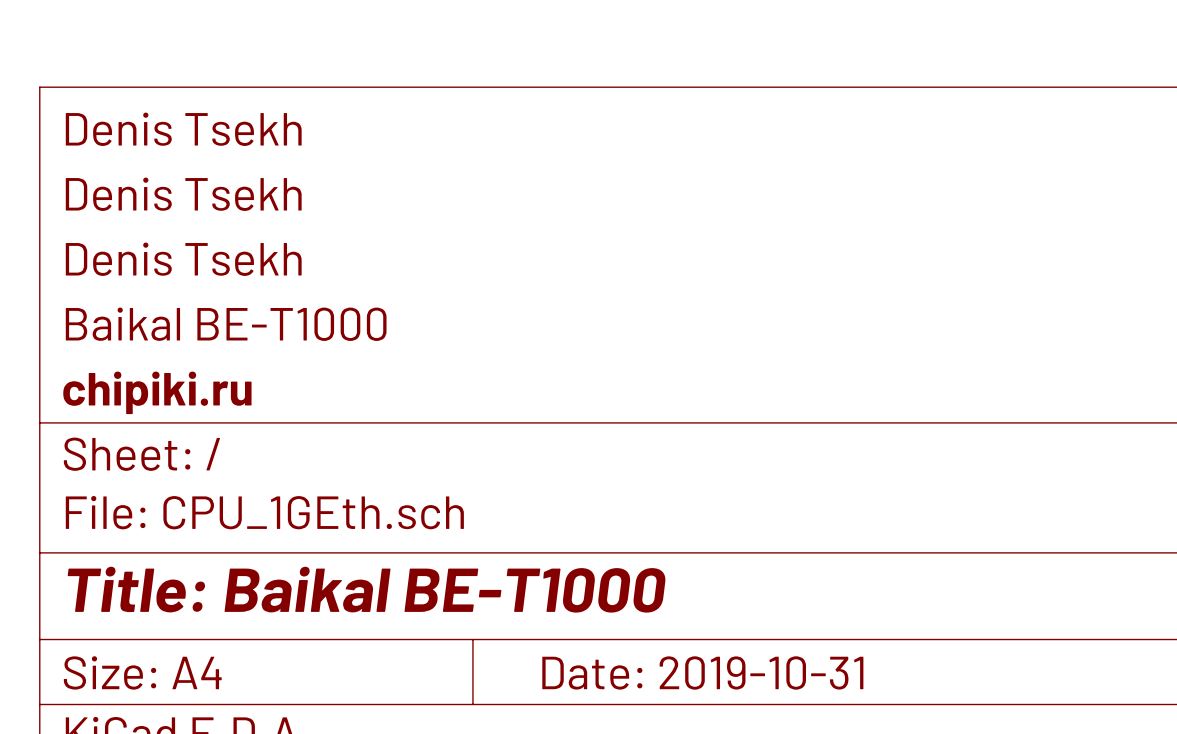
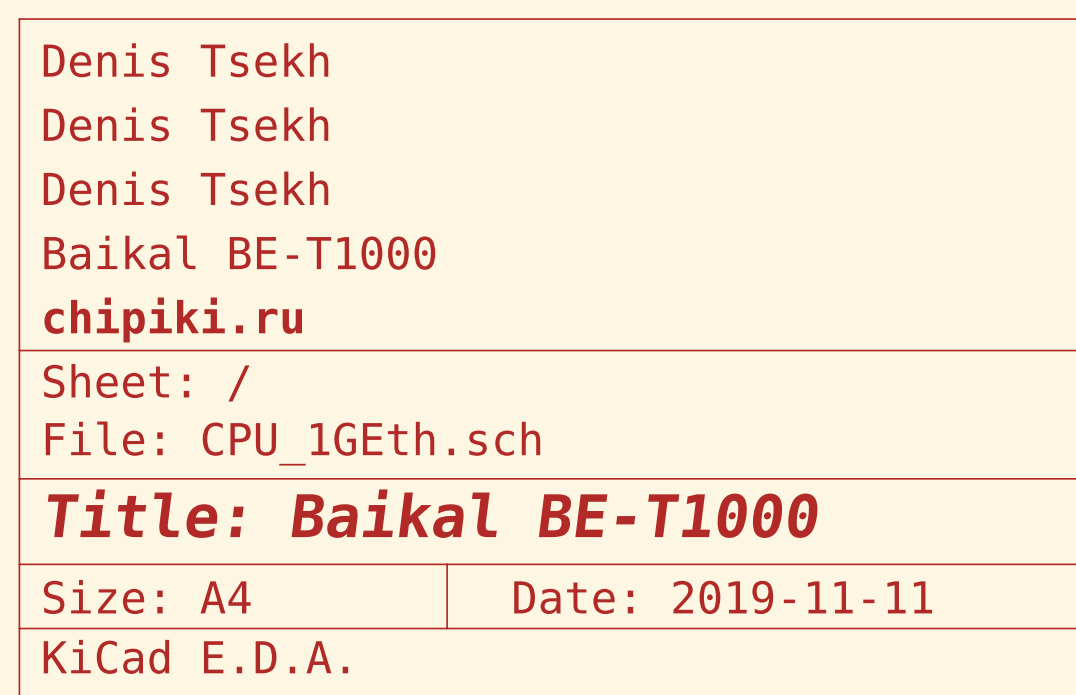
title block: Date: 2019-10-31 (702, 672) -> Date: 2019-11-11 (723, 597)

